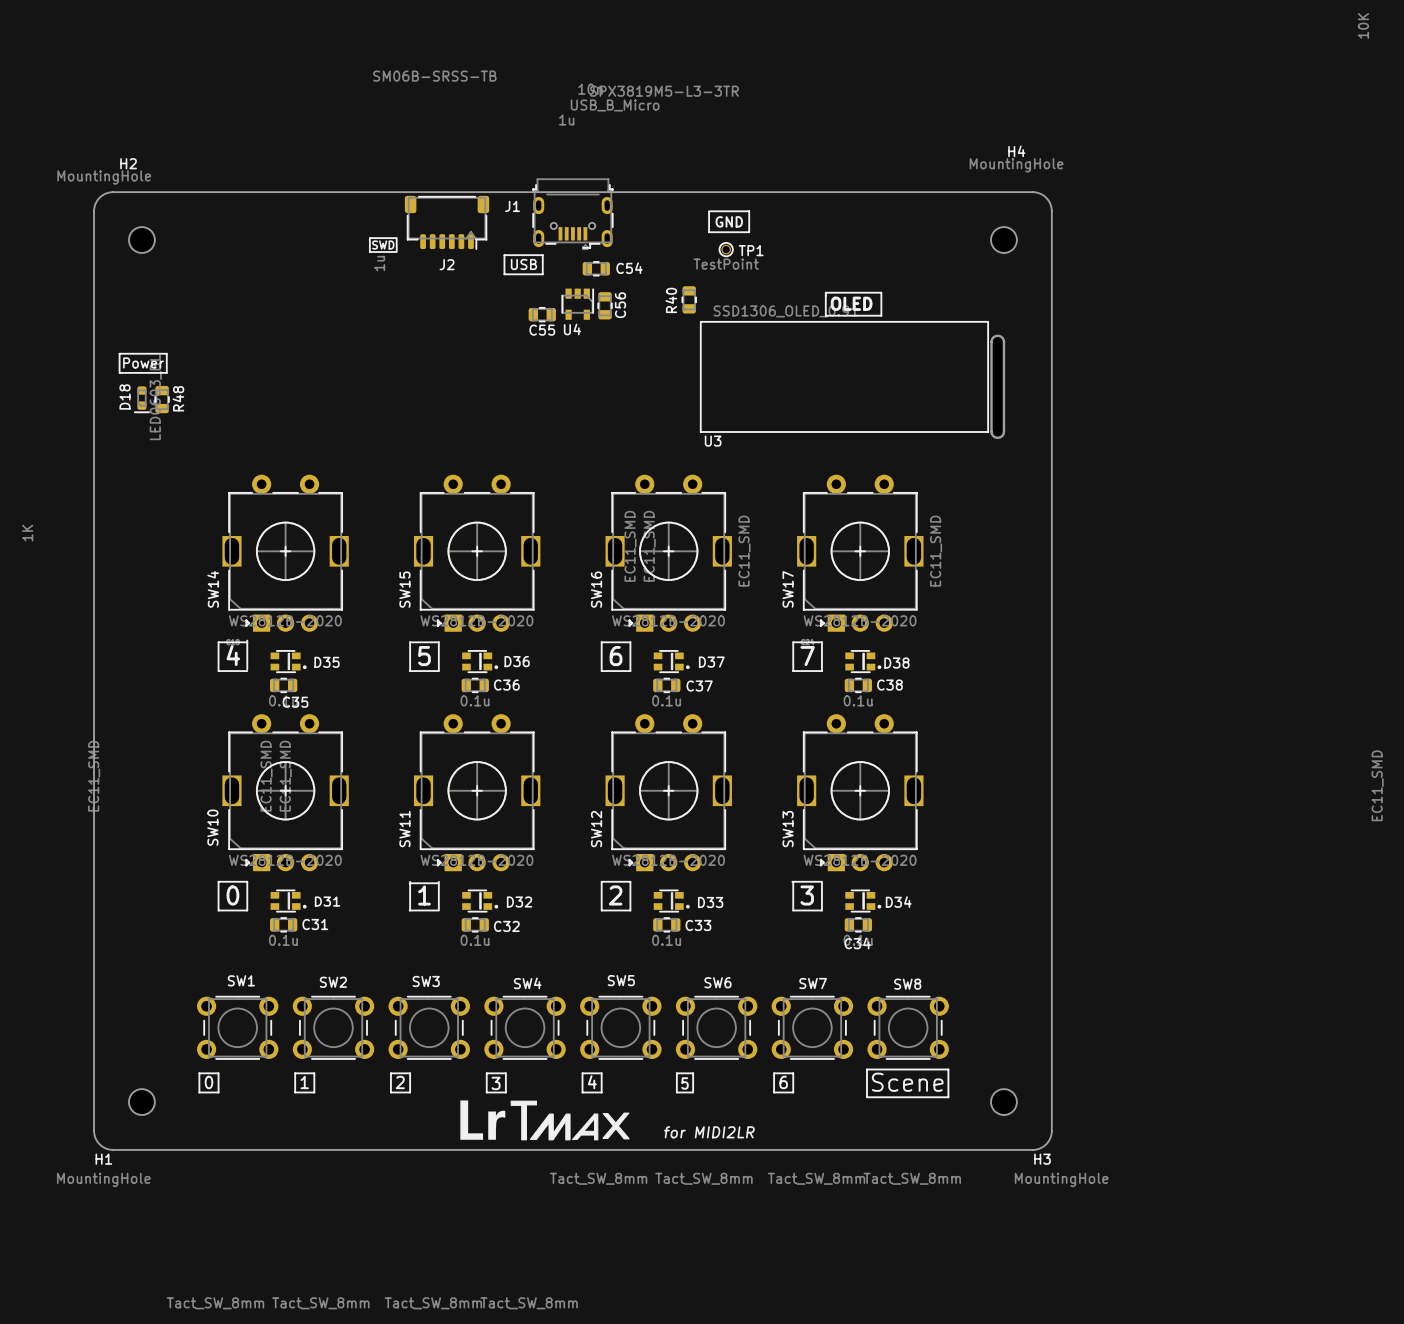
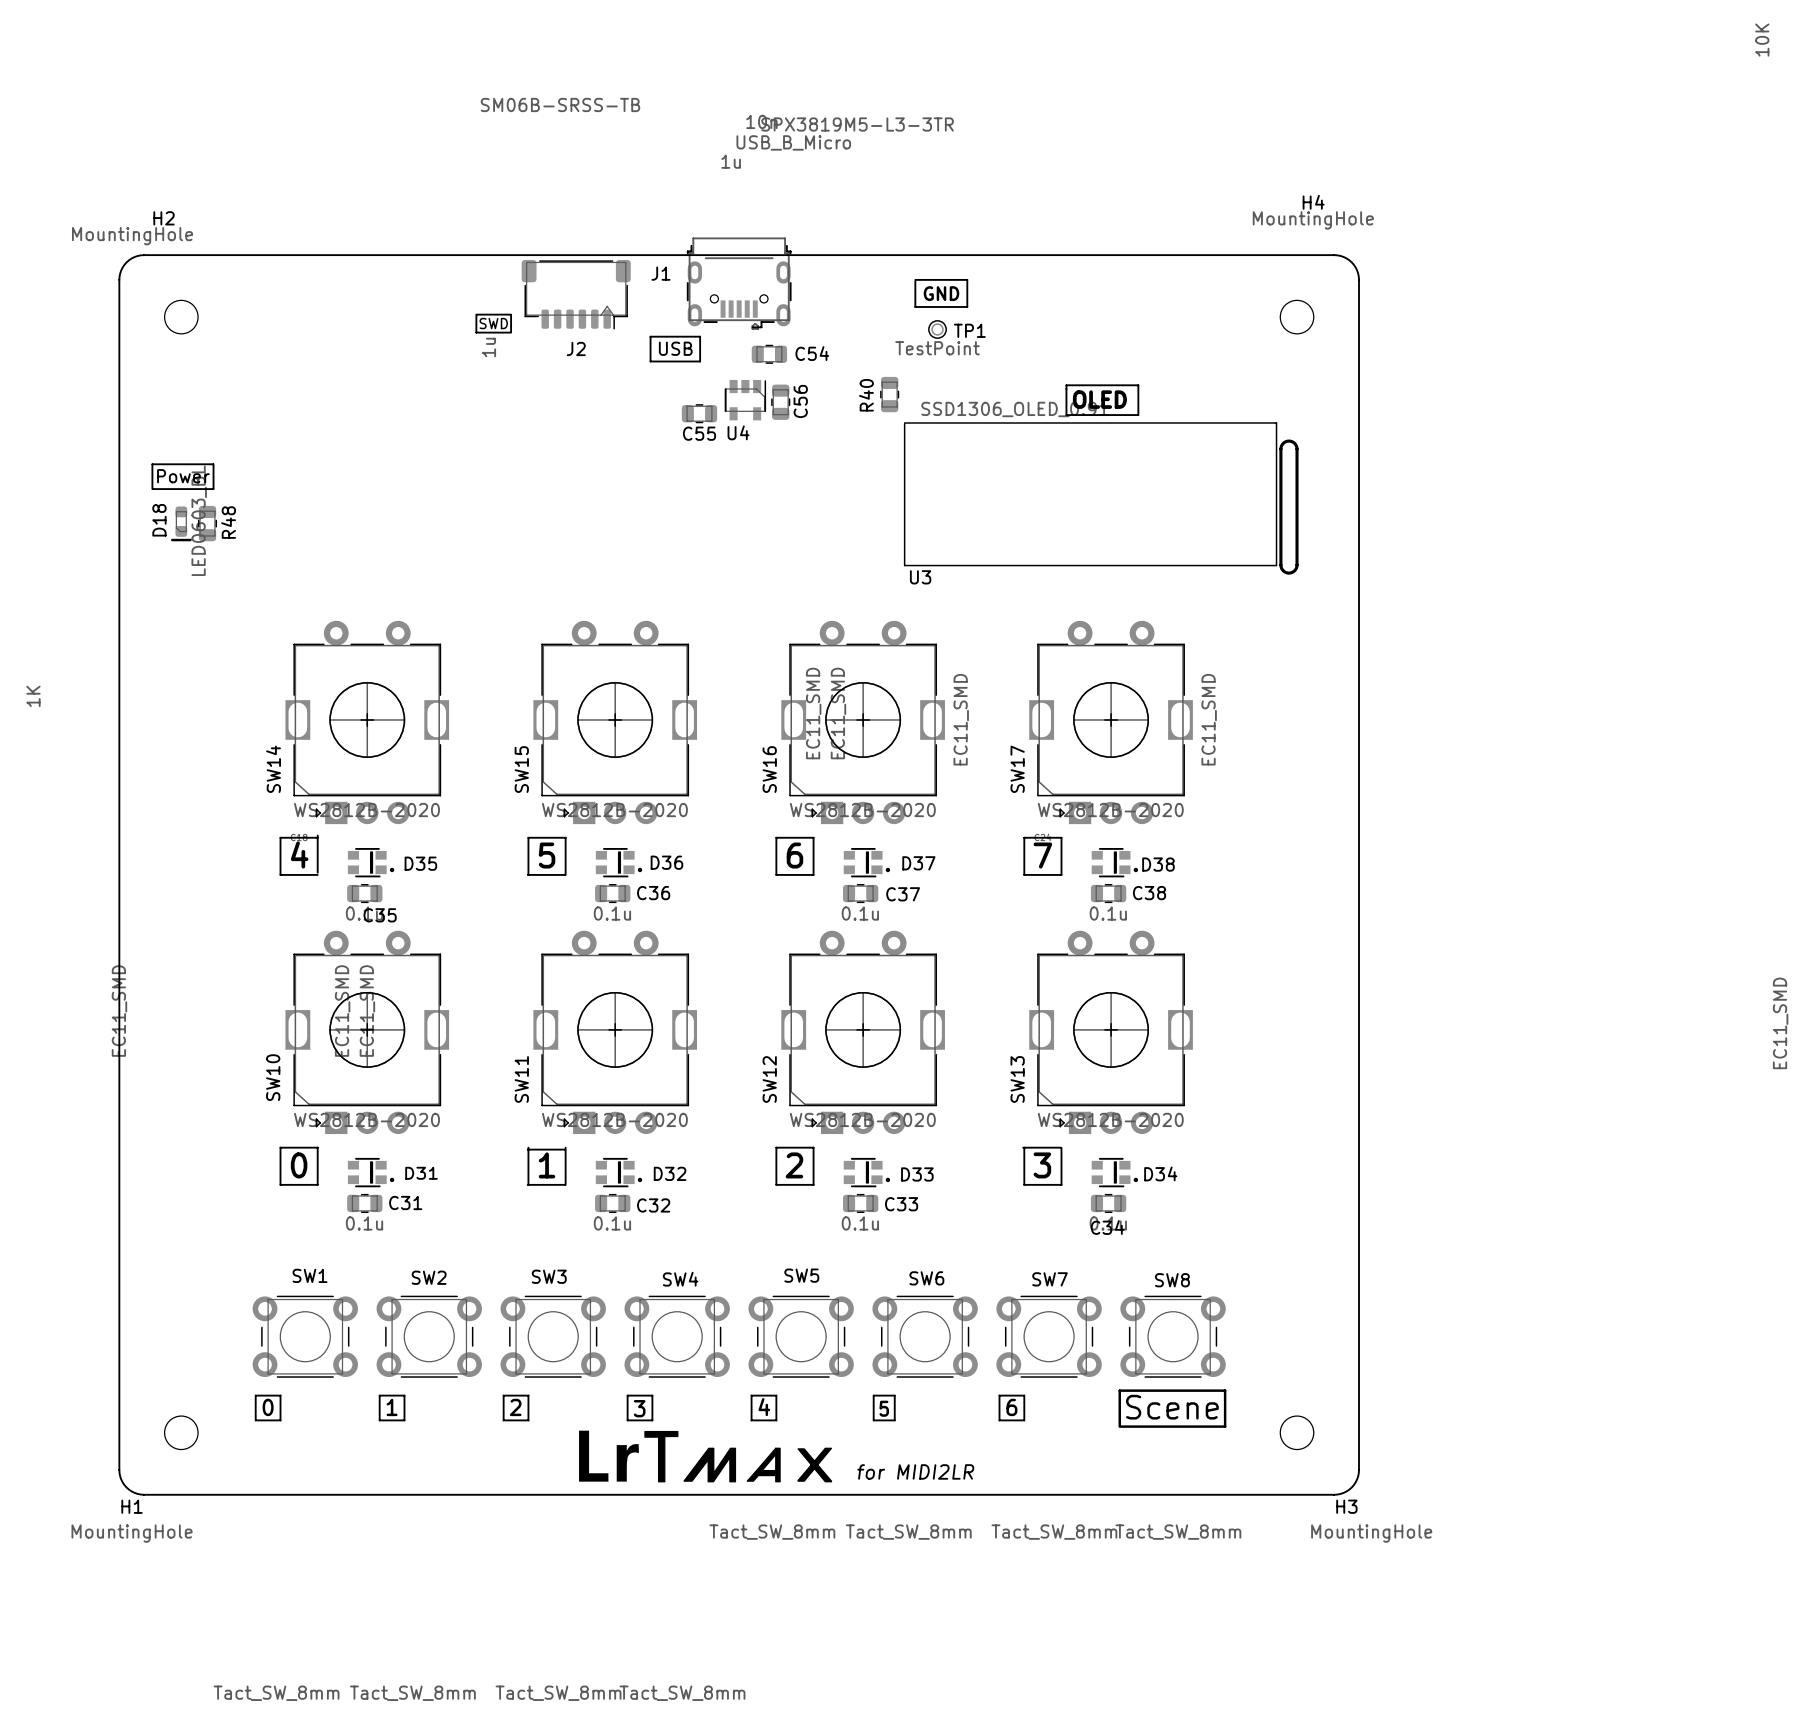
drawing shape: [460, 1100, 630, 1141] -> [579, 1430, 833, 1483]

